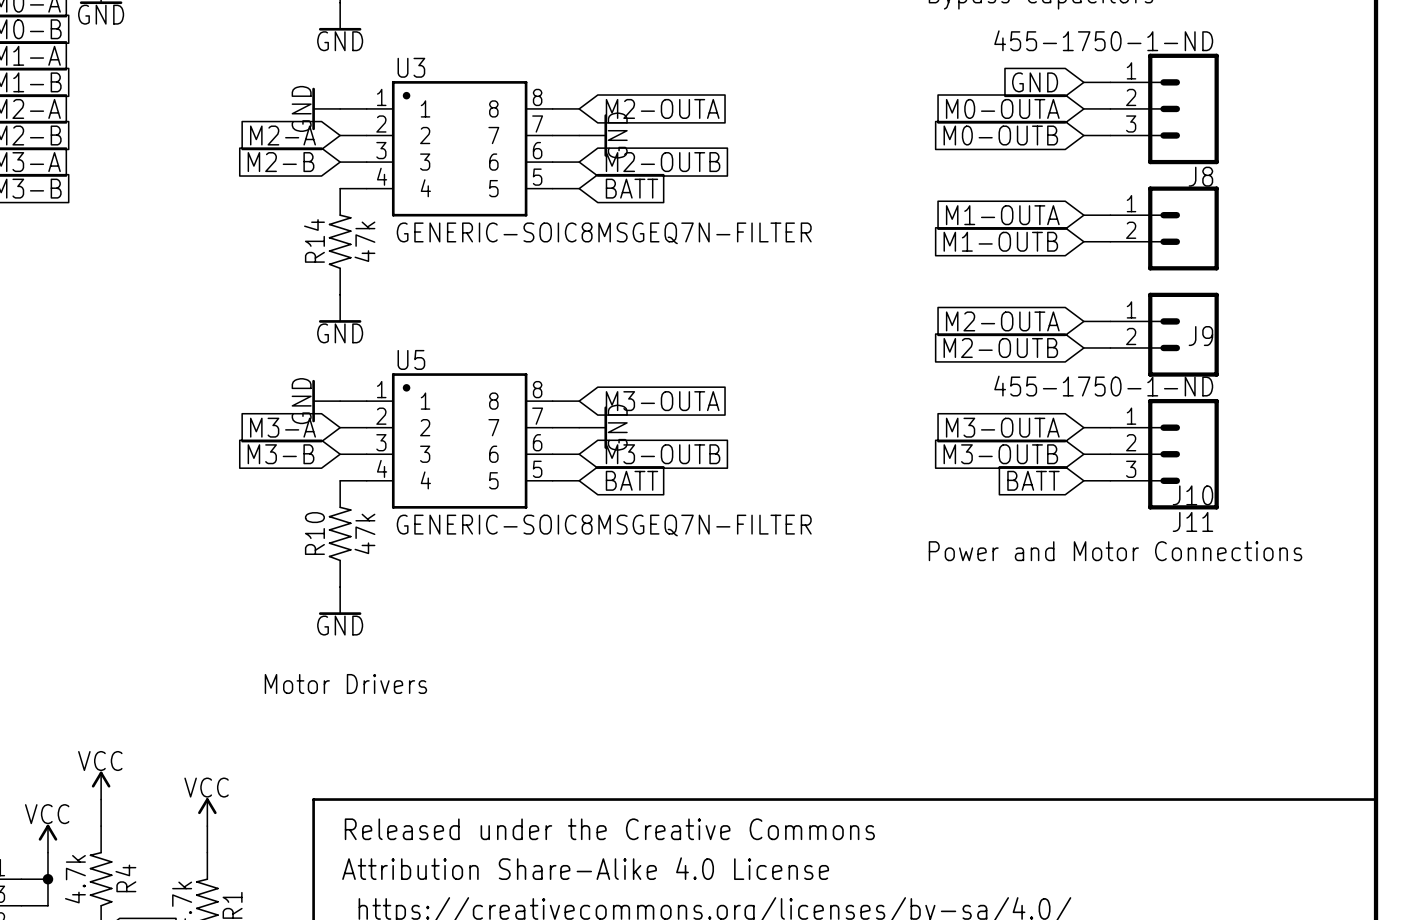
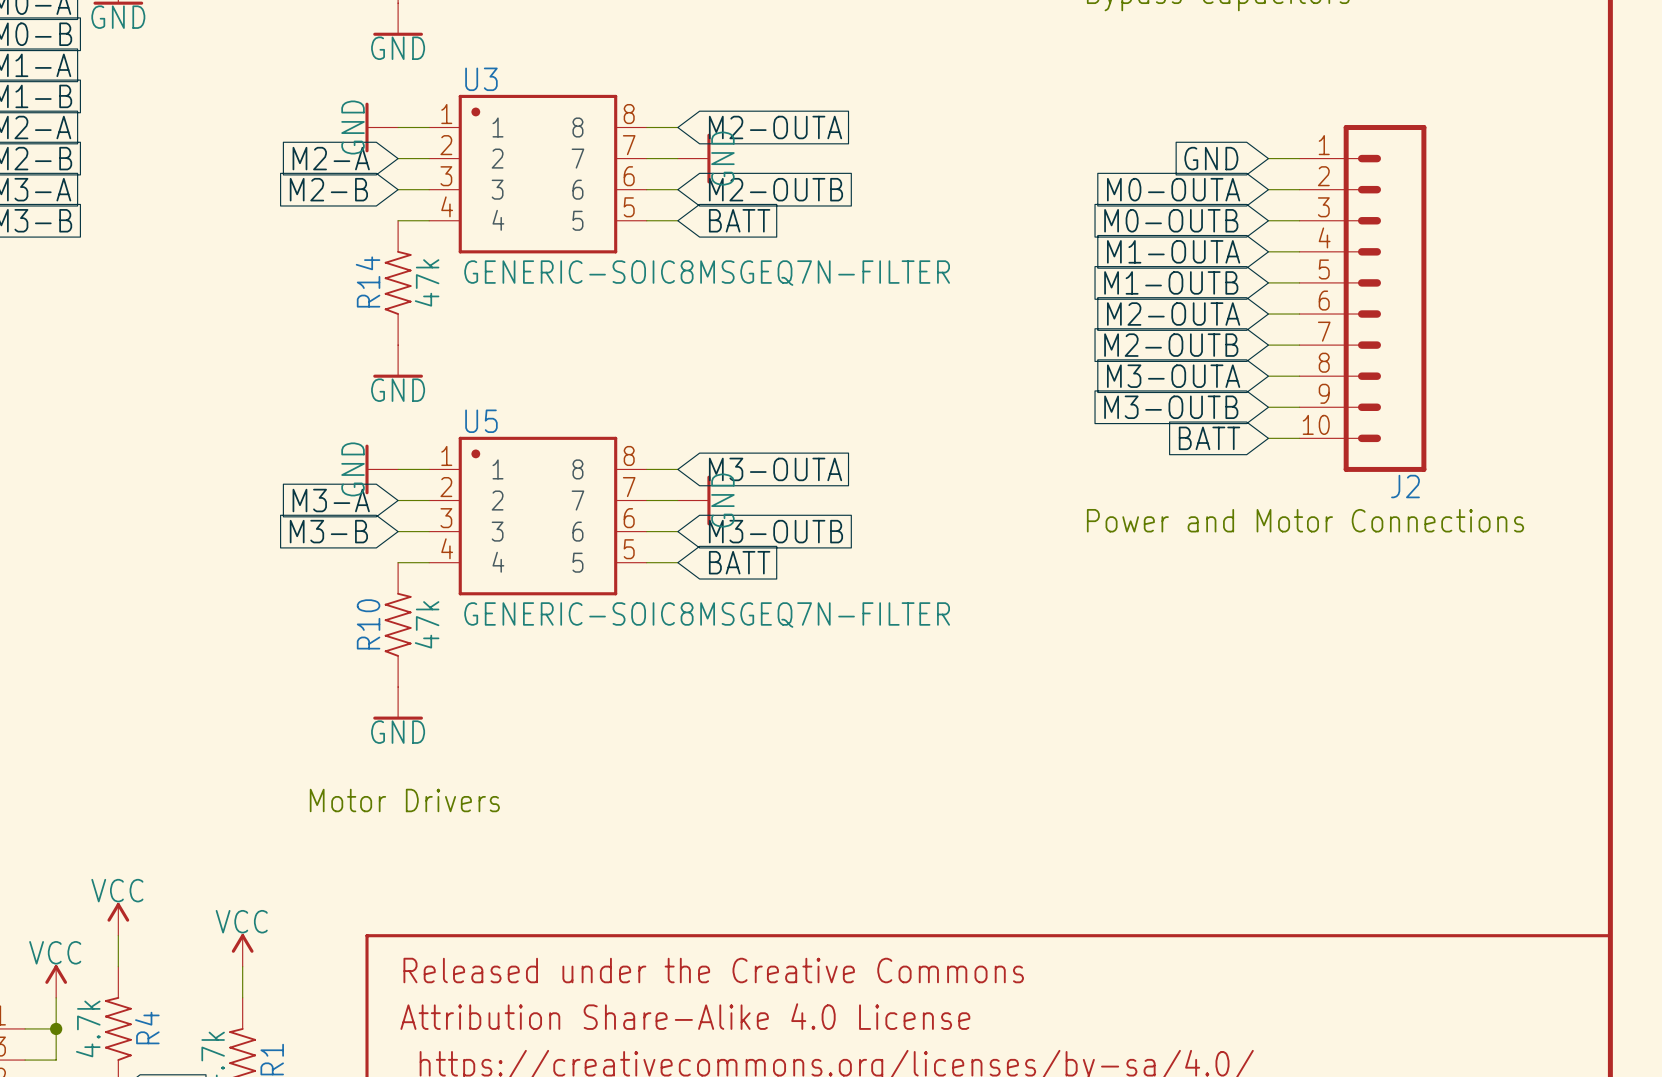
global label: GND (1035, 82) -> none
wire: (1083, 82) (1110, 82) -> (1268, 189) (1299, 189)
global label position: M0-OUTA (1002, 108) -> M0-OUTA (1173, 189)
wire: (1083, 108) (1110, 108) -> (1268, 220) (1299, 220)
J8: 455-1750-1-ND (1164, 108) -> none
global label: M0-OUTB (1000, 135) -> GND (1211, 158)
global label: none -> M0-OUTB (1171, 220)
J9: (1164, 228) -> none
J2: none -> (1362, 298)
global label: none -> M2-OUTA (1173, 314)
global label: none -> M2-OUTB (1171, 345)
global label: M2-OUTA (1002, 321) -> M3-OUTA (1173, 376)
J10: (1164, 334) -> none
global label: M2-OUTB (1000, 347) -> M3-OUTB (1171, 407)
global label: M3-OUTA (1002, 427) -> none
wire: (1083, 427) (1110, 427) -> (1268, 314) (1299, 314)
global label: M3-OUTB (1000, 454) -> none
wire: (1083, 454) (1110, 454) -> (1268, 345) (1299, 345)
J11: 455-1750-1-ND (1164, 454) -> none
global label position: BATT (1033, 480) -> BATT (1209, 438)
wire: (1083, 480) (1110, 480) -> (1268, 438) (1299, 438)
text position: Power and Motor Connections (1115, 551) -> Power and Motor Connections (1305, 520)

